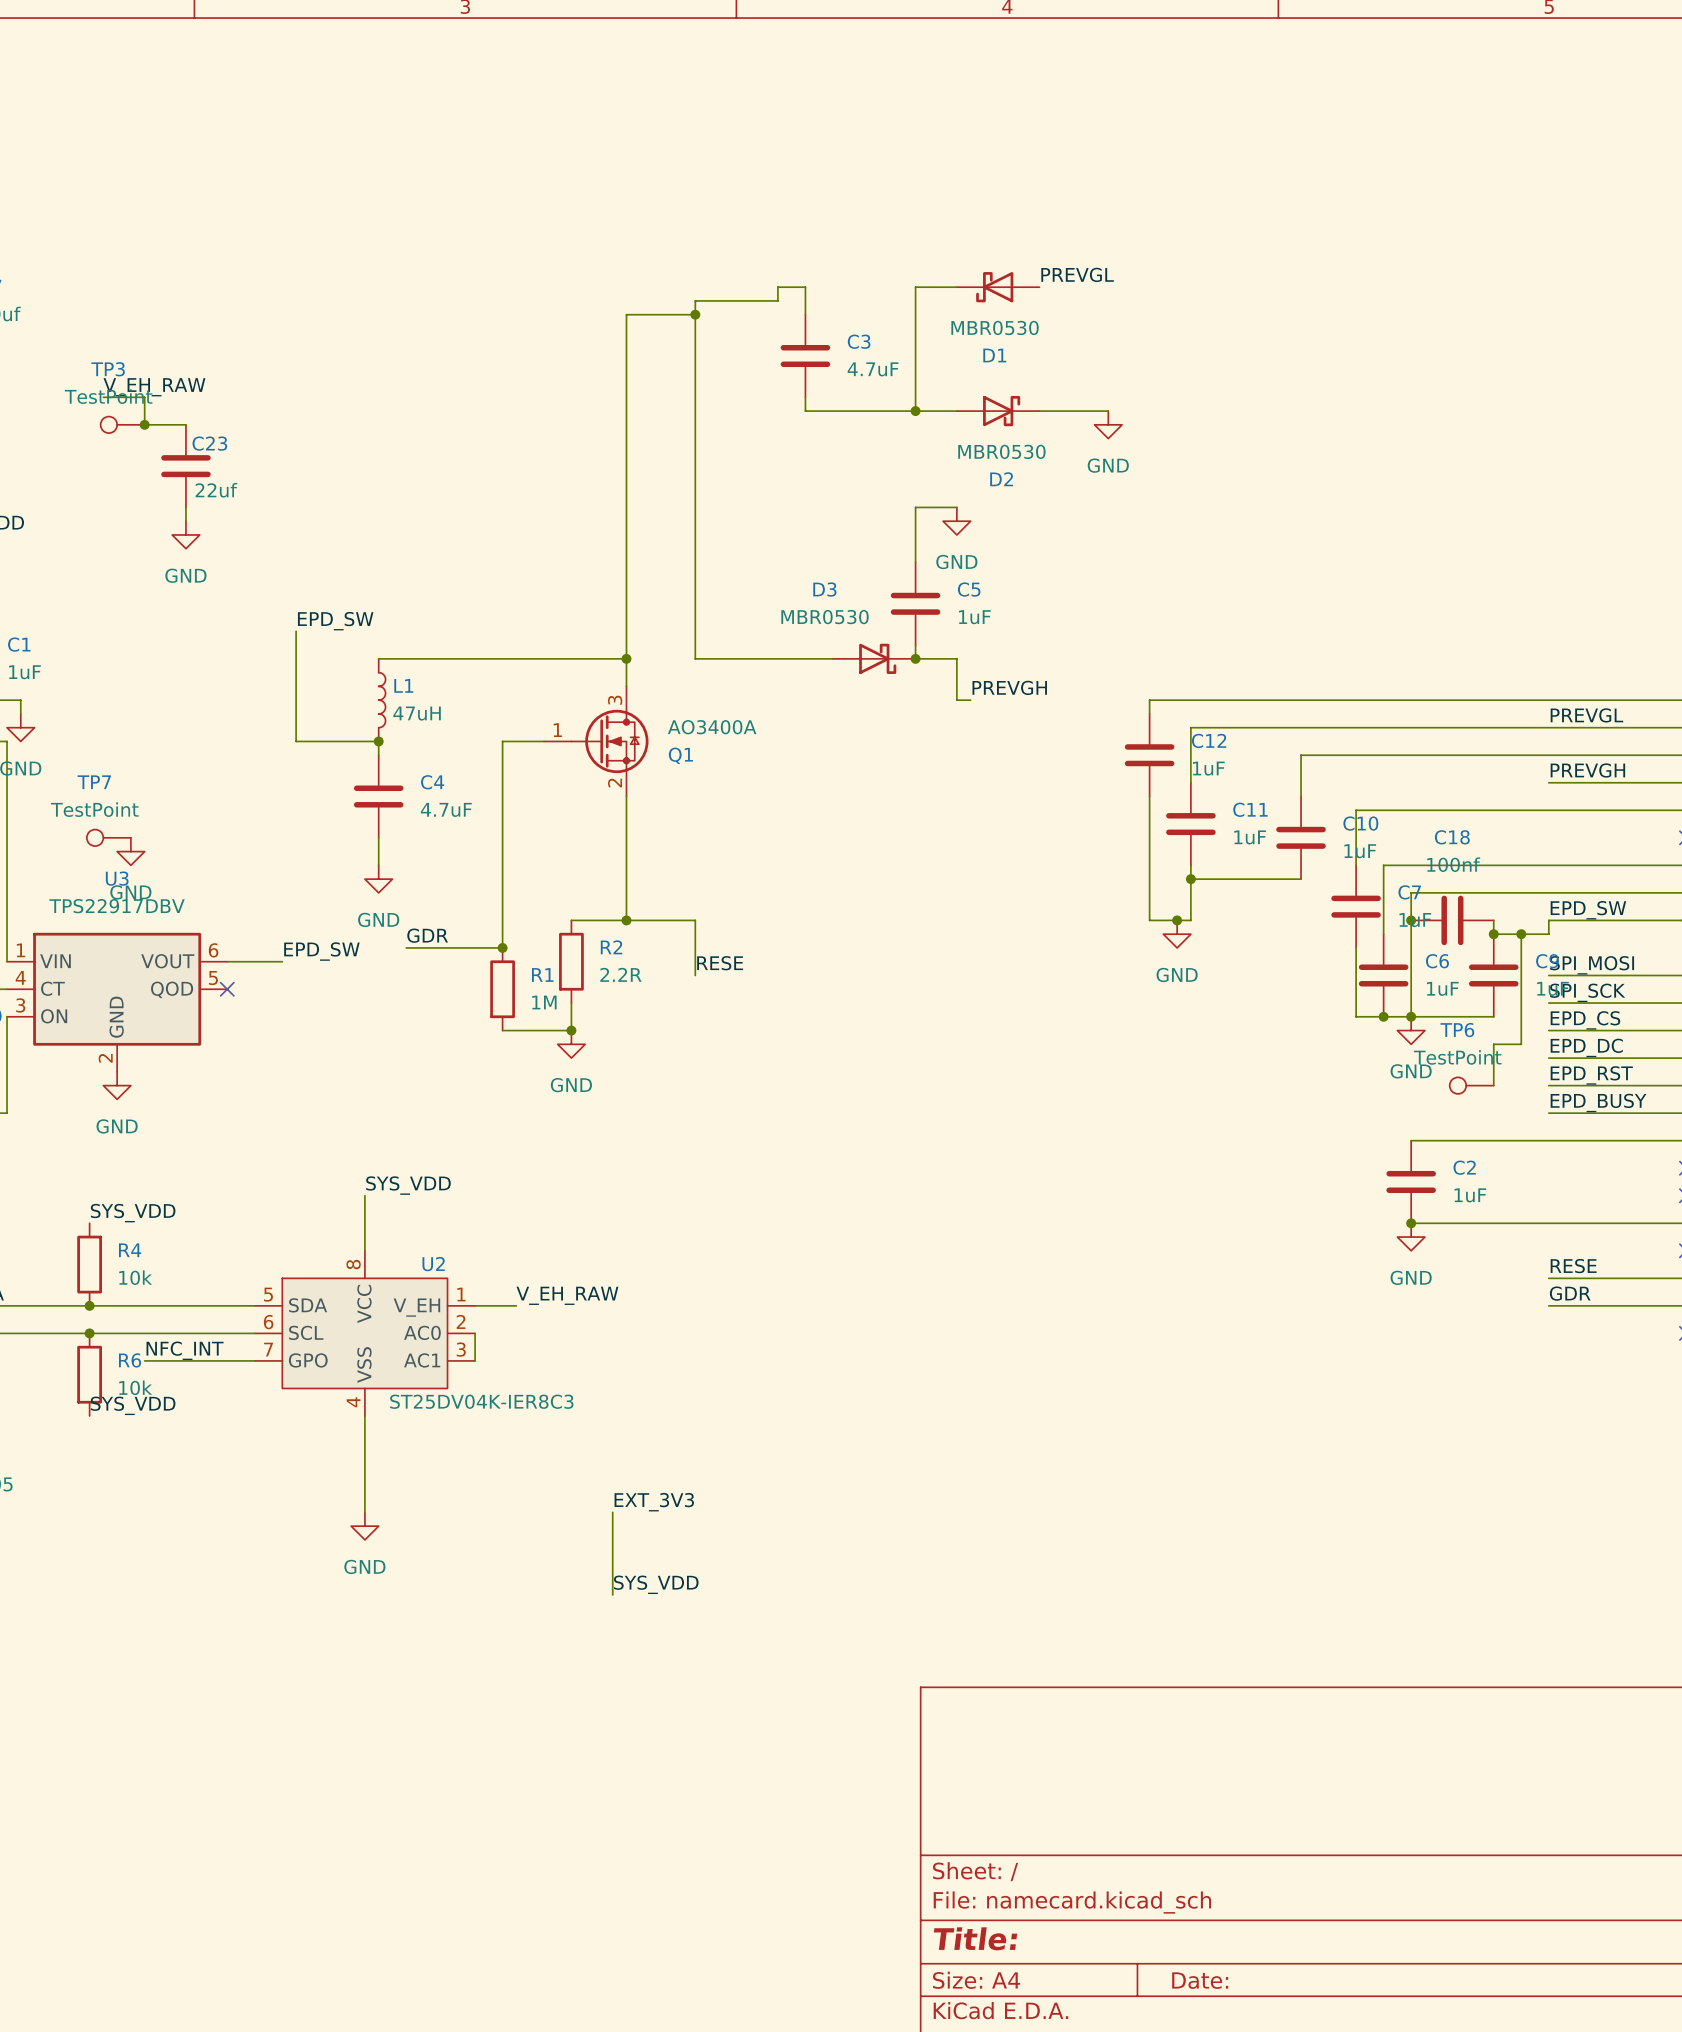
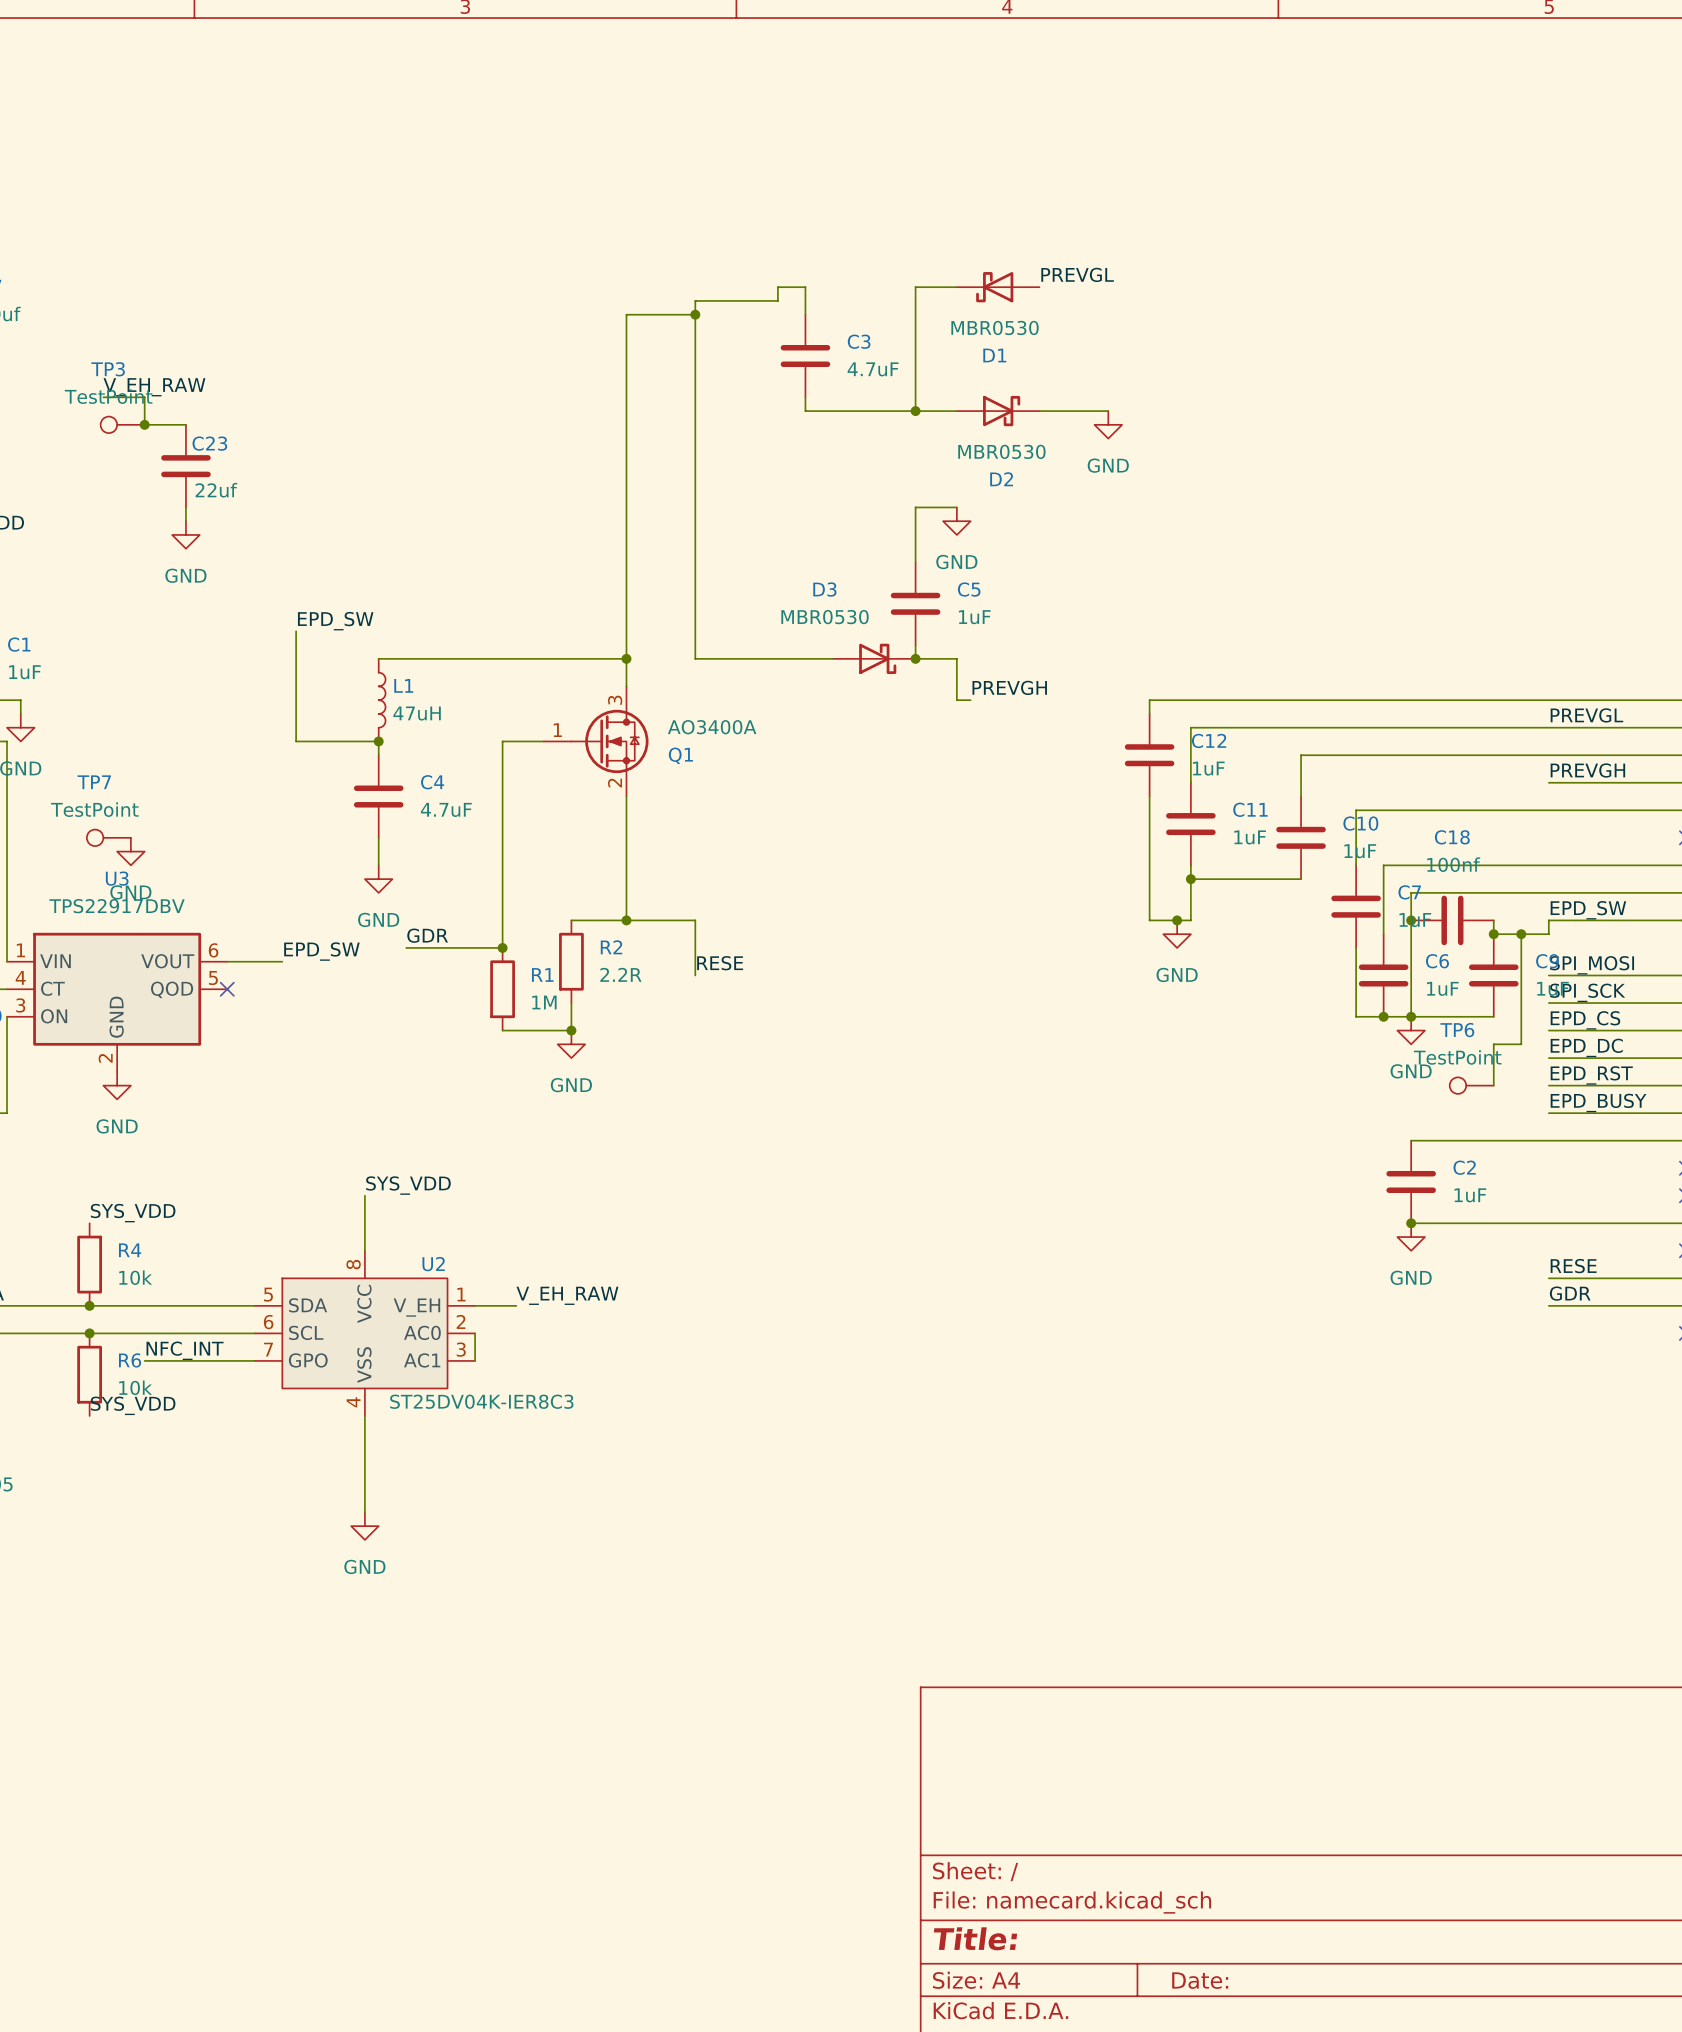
label: EXT_3V3 (654, 1502) -> none
wire: (612, 1512) (612, 1594) -> none
label: SYS_VDD (656, 1584) -> none

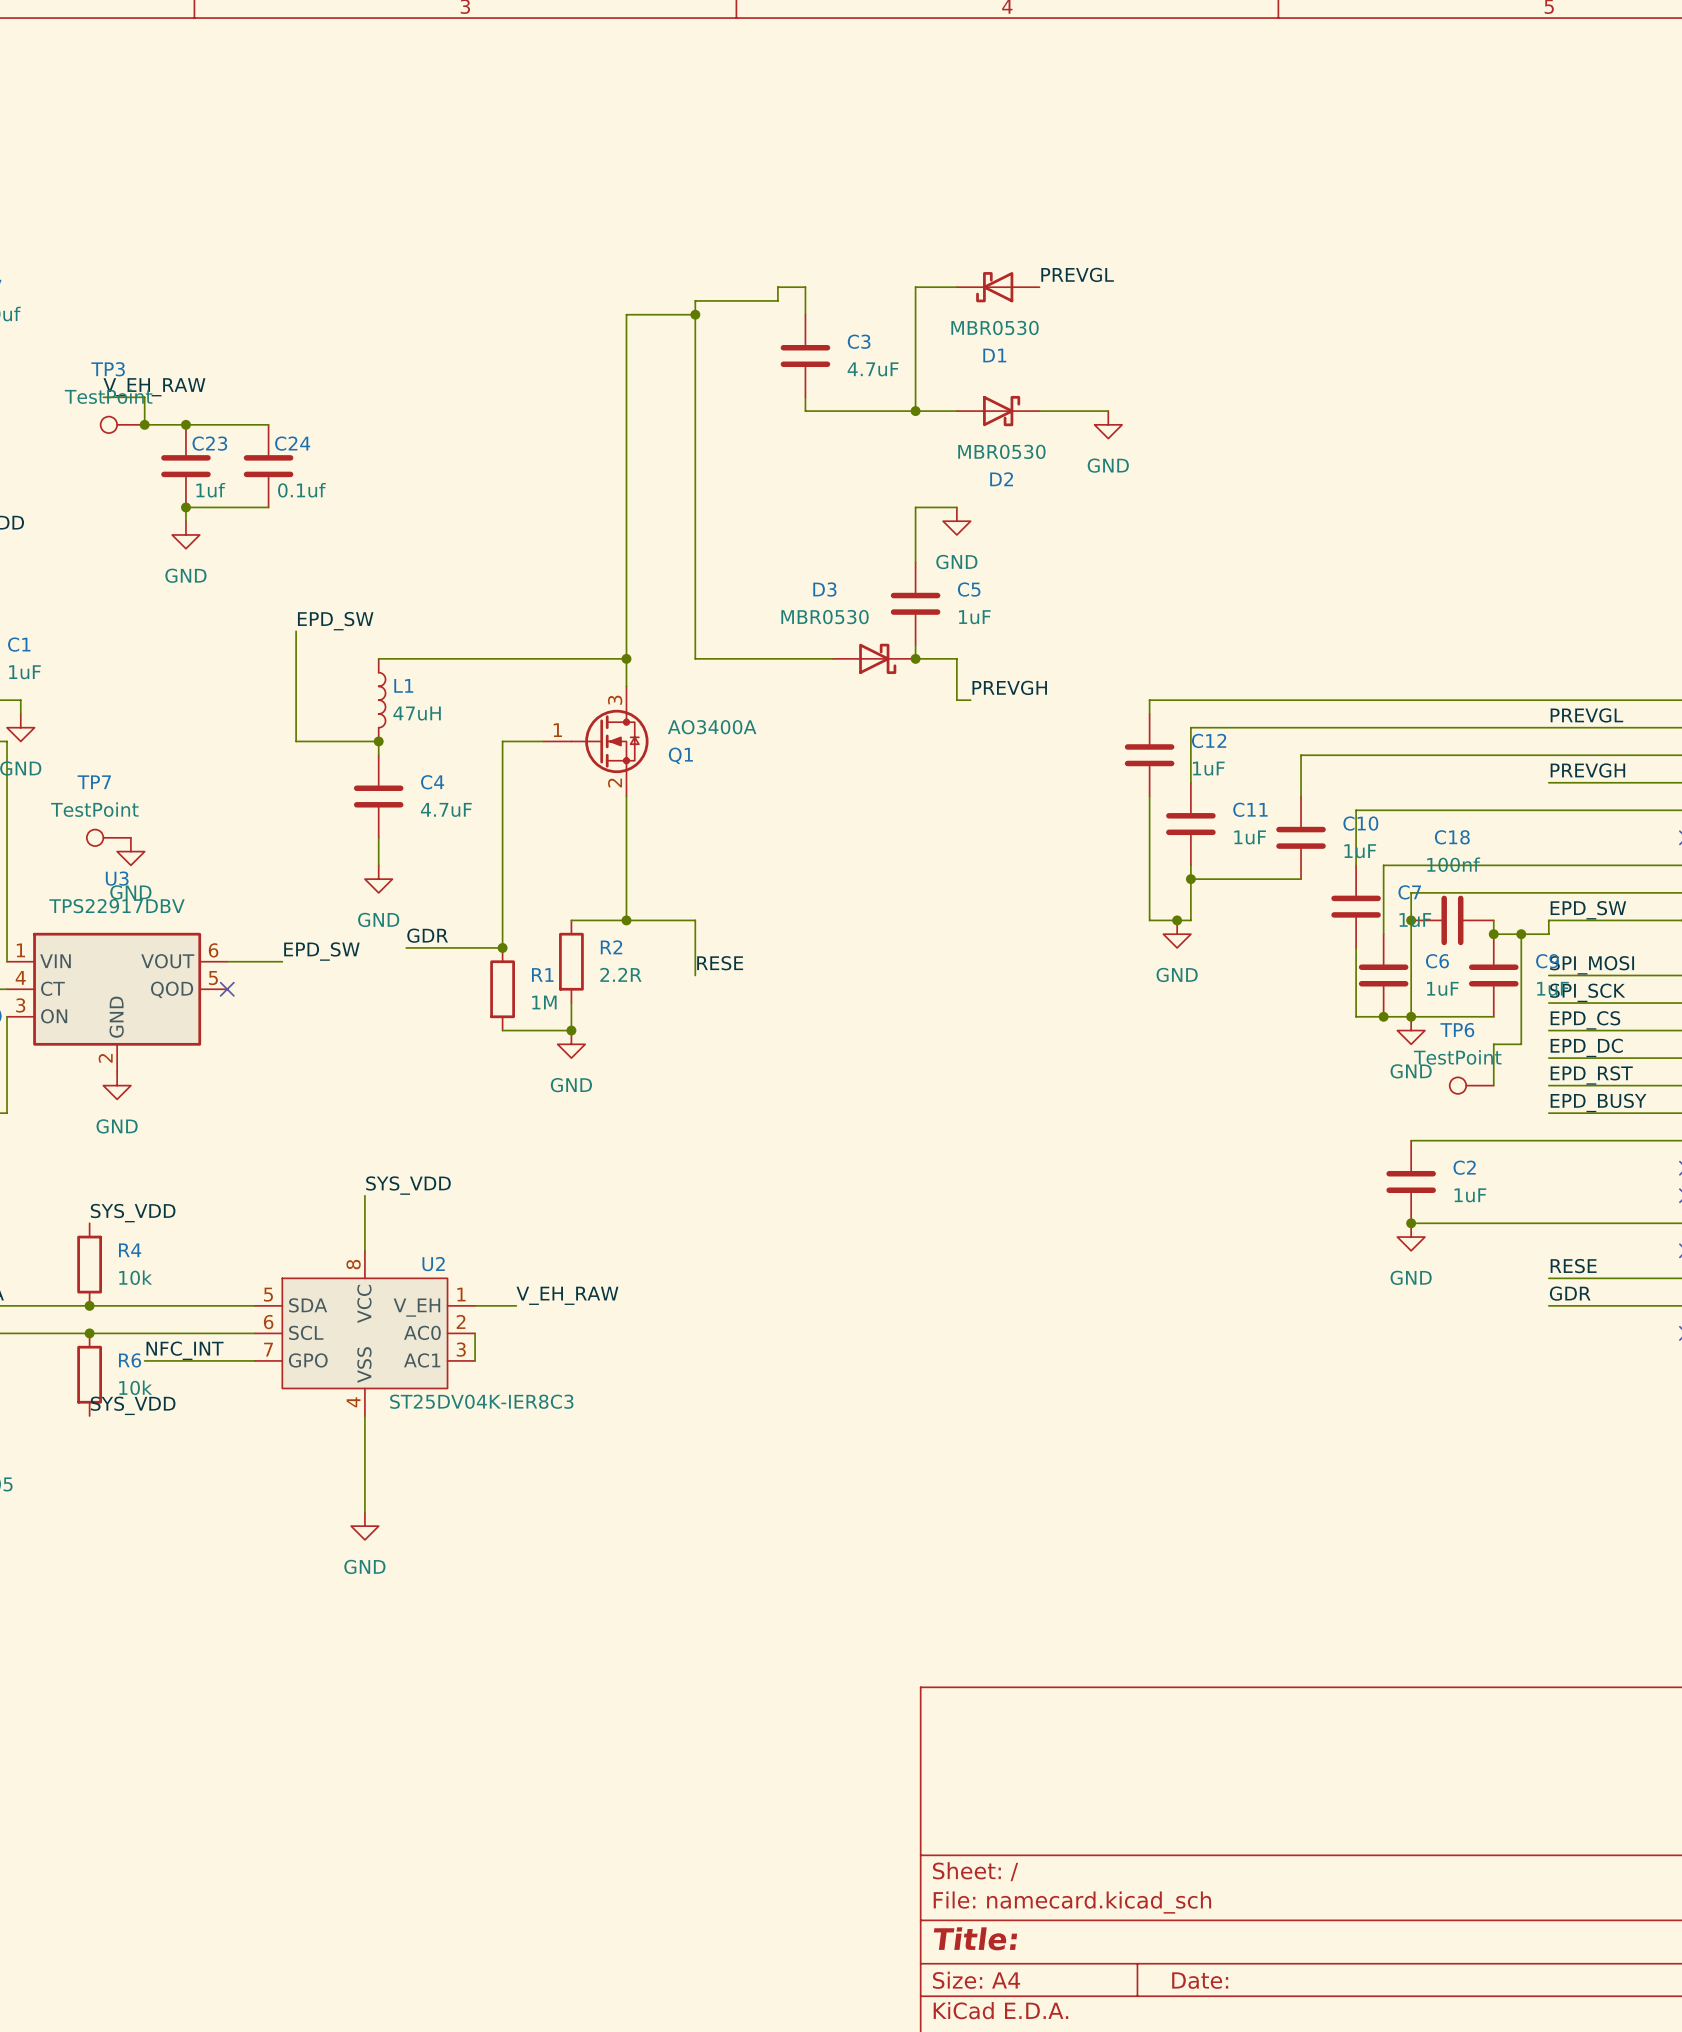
wire: none -> (185, 424) (268, 424)
junction: none -> (185, 424)
C24: none -> 0.1uf (268, 466)
C23 value: 22uf (216, 490) -> 1uf (210, 490)
wire: none -> (185, 507) (268, 507)
junction: none -> (185, 507)

